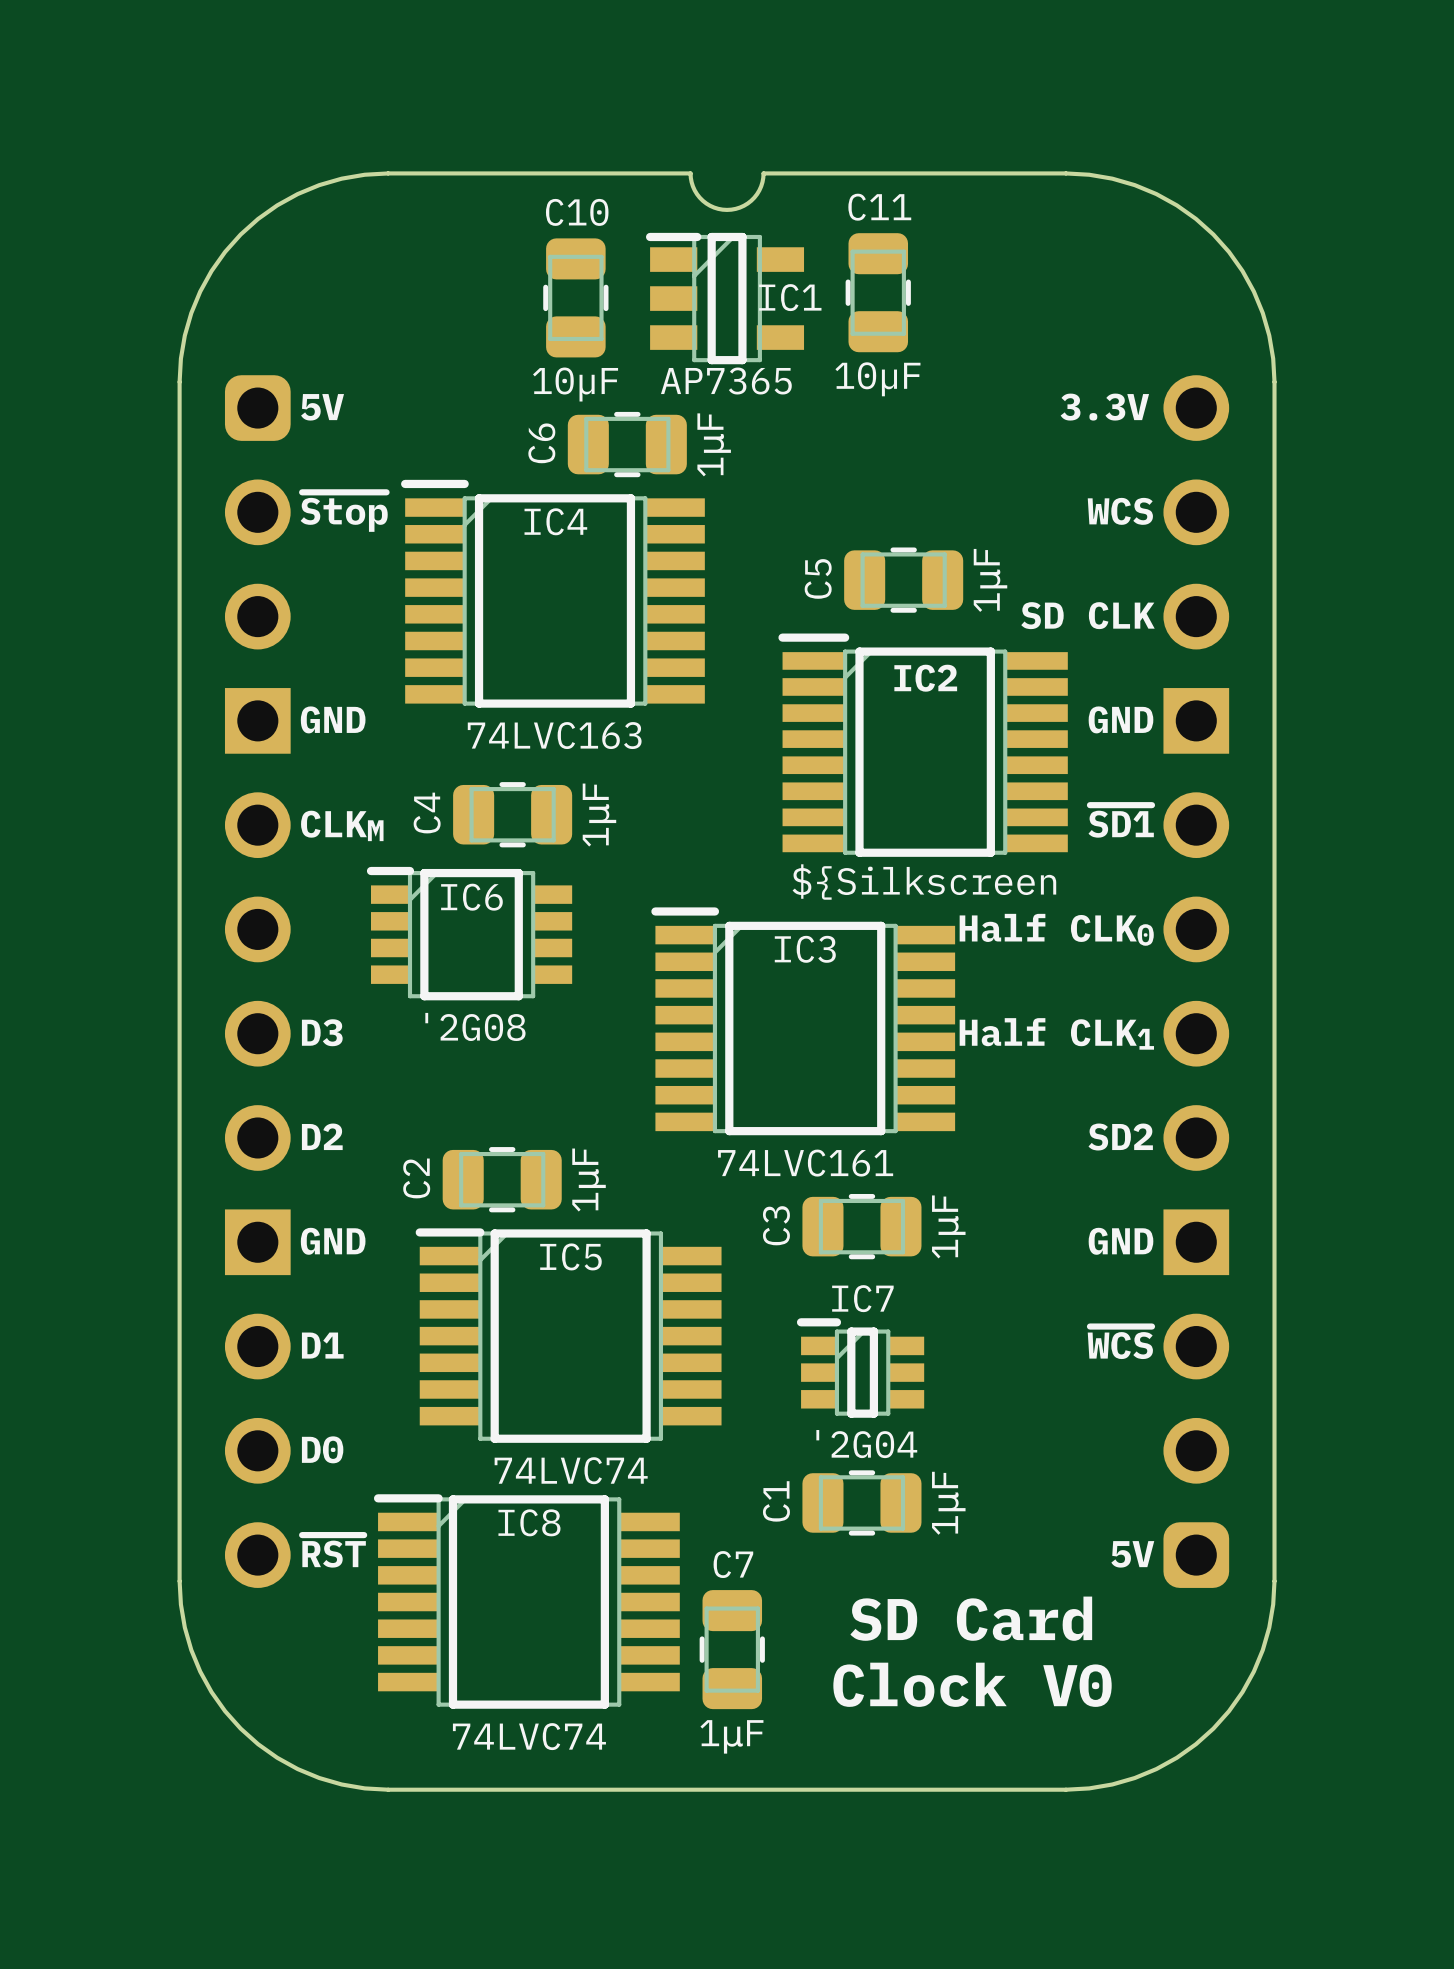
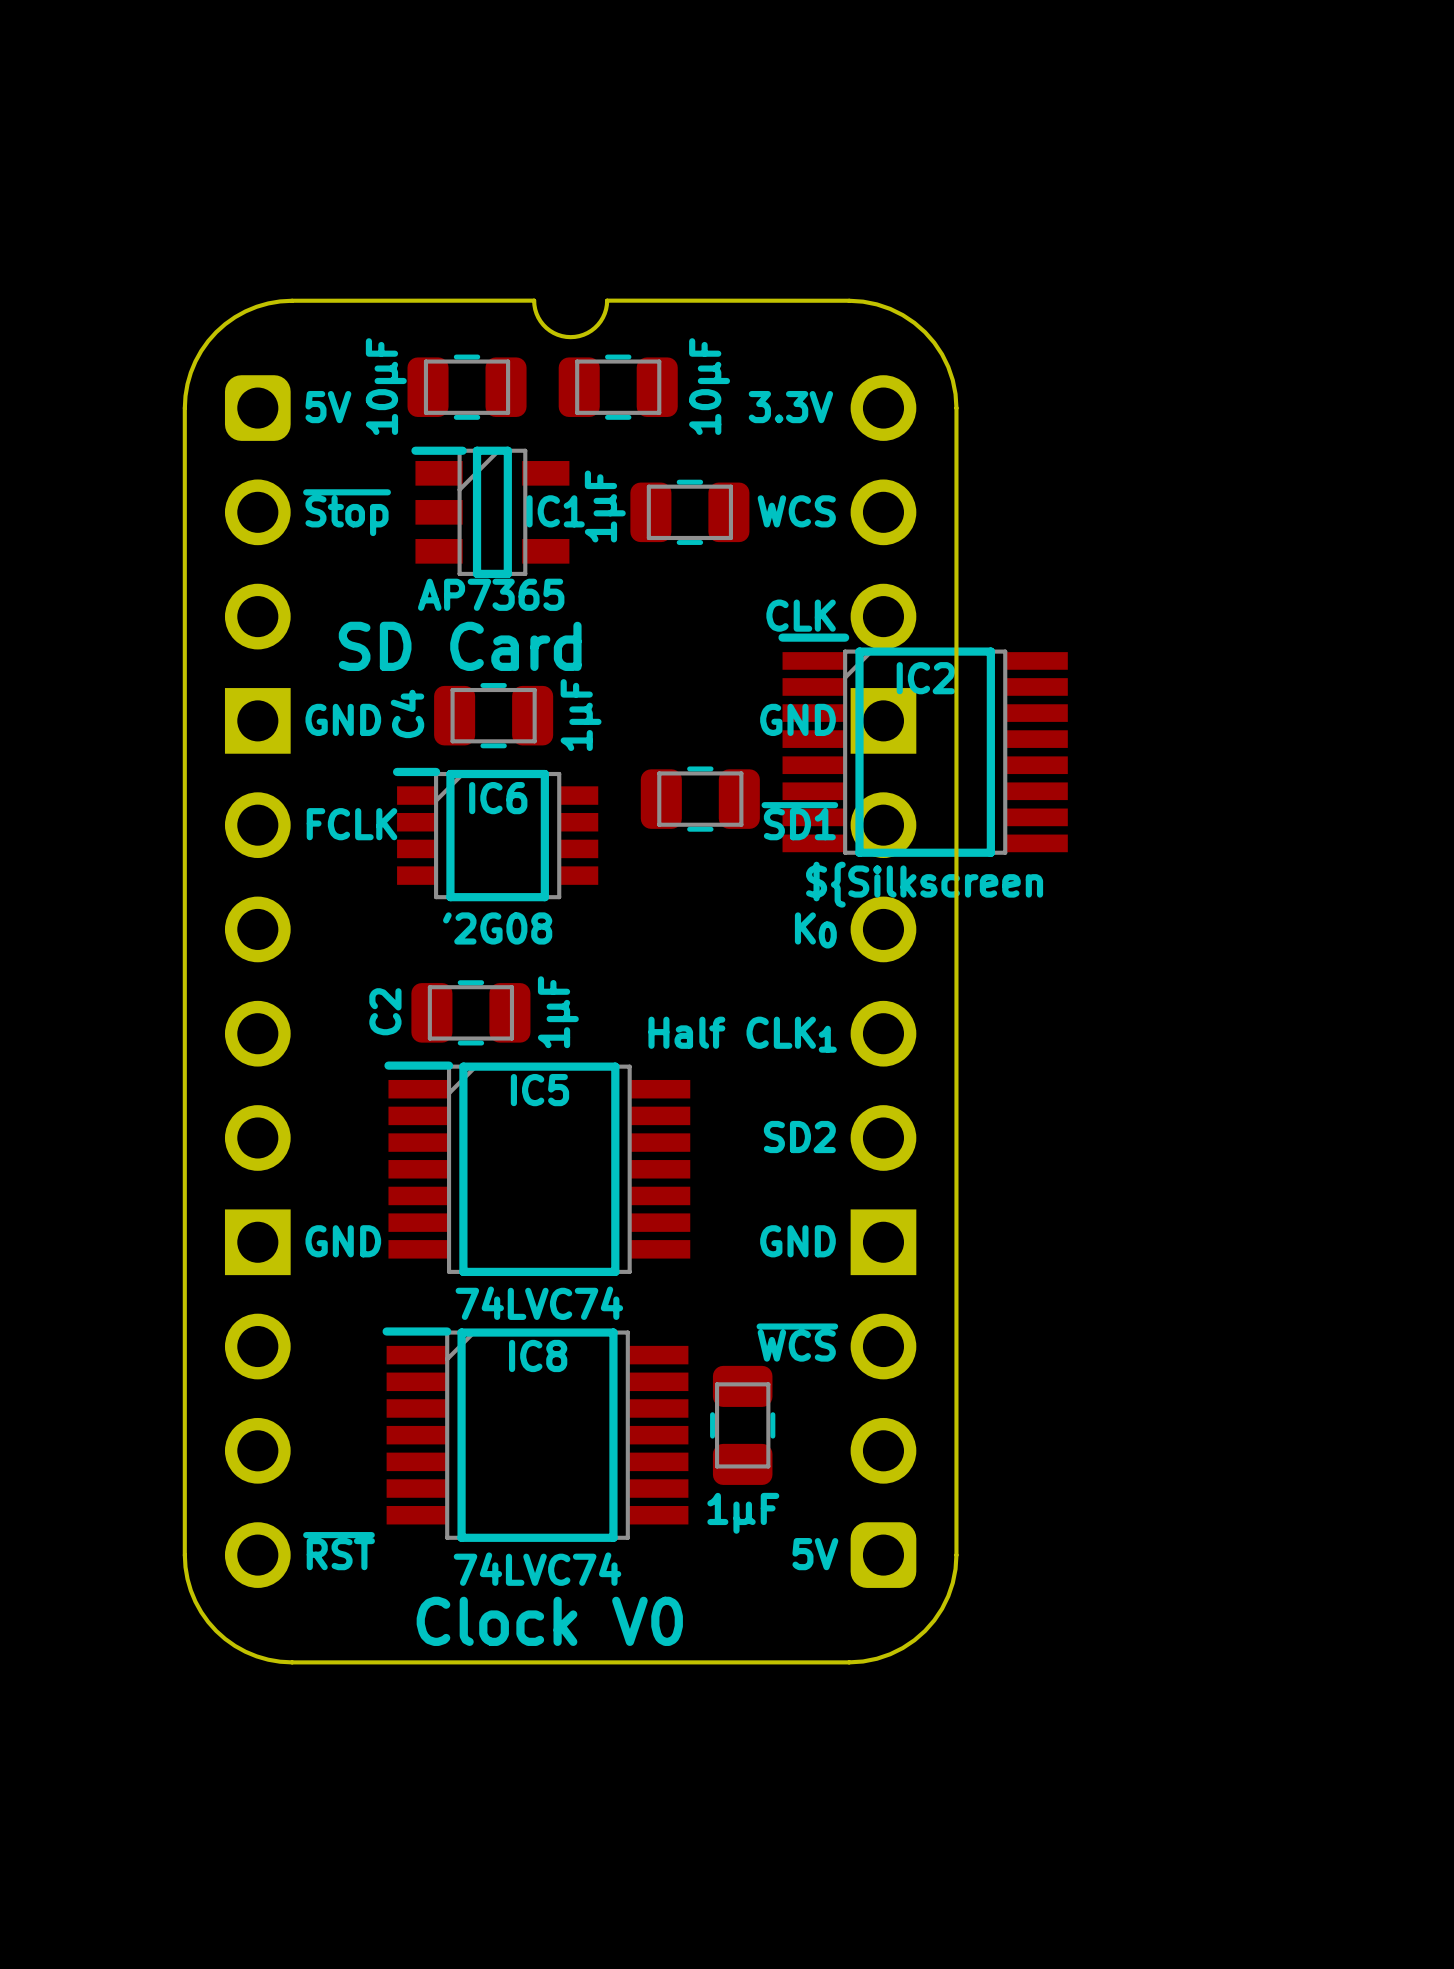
C11: 10µF (878, 292) -> none
C10: 10µF (575, 297) -> none
IC1 position: (725, 298) -> (490, 512)
part: none -> 10µF (467, 387)
part: none -> 10µF (618, 387)
text position: 3.3V (1104, 407) -> 3.3V (790, 407)
C6: 1μF (627, 444) -> none
text position: WCS (1120, 511) -> WCS (796, 511)
part: none -> 1μF (689, 512)
C5: 1μF (903, 580) -> none
IC4: (552, 593) -> none
text: none -> CLK (801, 615)
text: SD CLK (1087, 615) -> none
text: none -> SD Card (460, 646)
text: none -> GND (797, 719)
text: GND (1120, 719) -> none
part: none -> (700, 799)
C4 position: (512, 814) -> (493, 715)
text position: ~{SD1} (1121, 821) -> ~{SD1} (799, 821)
text: CLKM (342, 825) -> FCLK (351, 824)
text: Half CLK0 (1056, 929) -> none
text: none -> K0 (815, 930)
IC6 position: (469, 933) -> (495, 834)
part: none -> (570, 981)
part: (727, 981) -> none
IC3: (803, 1021) -> none
text: D3 (322, 1032) -> none
text position: Half CLK1 (1056, 1033) -> Half CLK1 (742, 1034)
text: D2 (322, 1136) -> none
text position: SD2 (1120, 1137) -> SD2 (799, 1137)
C2 position: (502, 1179) -> (470, 1012)
C3: 1μF (861, 1226) -> none
text: none -> GND (797, 1241)
text: GND (1120, 1241) -> none
IC5 position: (568, 1335) -> (537, 1168)
text position: ~{WCS} (1120, 1342) -> ~{WCS} (797, 1342)
text: D1 (322, 1345) -> none
IC7: (860, 1367) -> none
part: none -> 1μF (742, 1425)
text: D0 (322, 1449) -> none
C1: 1μF (861, 1502) -> none
text position: 5V (1132, 1554) -> 5V (815, 1554)
IC8 position: (526, 1601) -> (535, 1434)
text: SD Card (971, 1618) -> none
C7: 1μF (732, 1649) -> none
text position: Clock V0 (972, 1684) -> Clock V0 (549, 1621)

